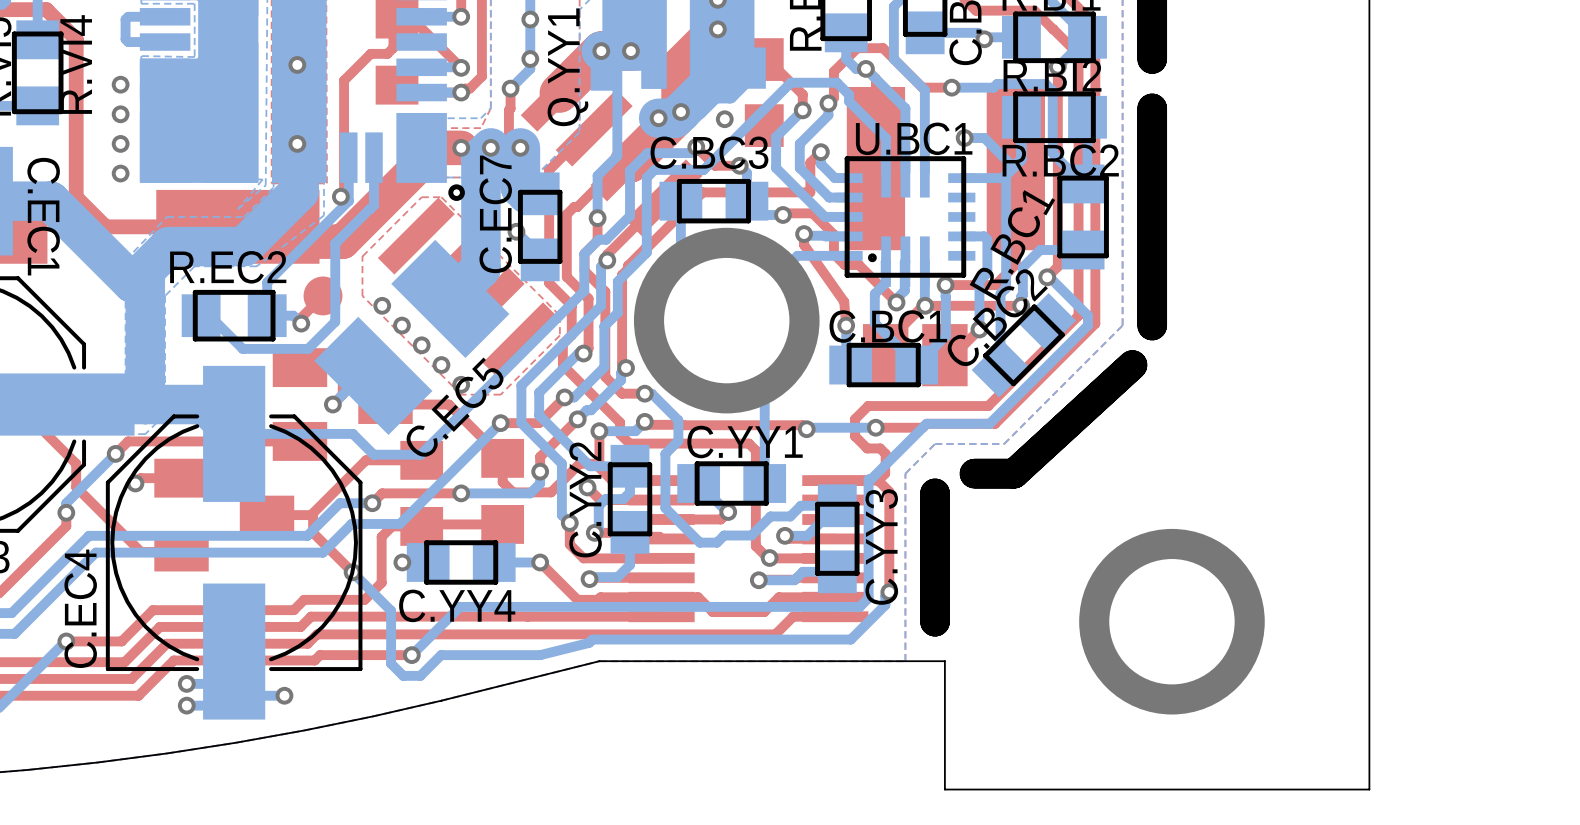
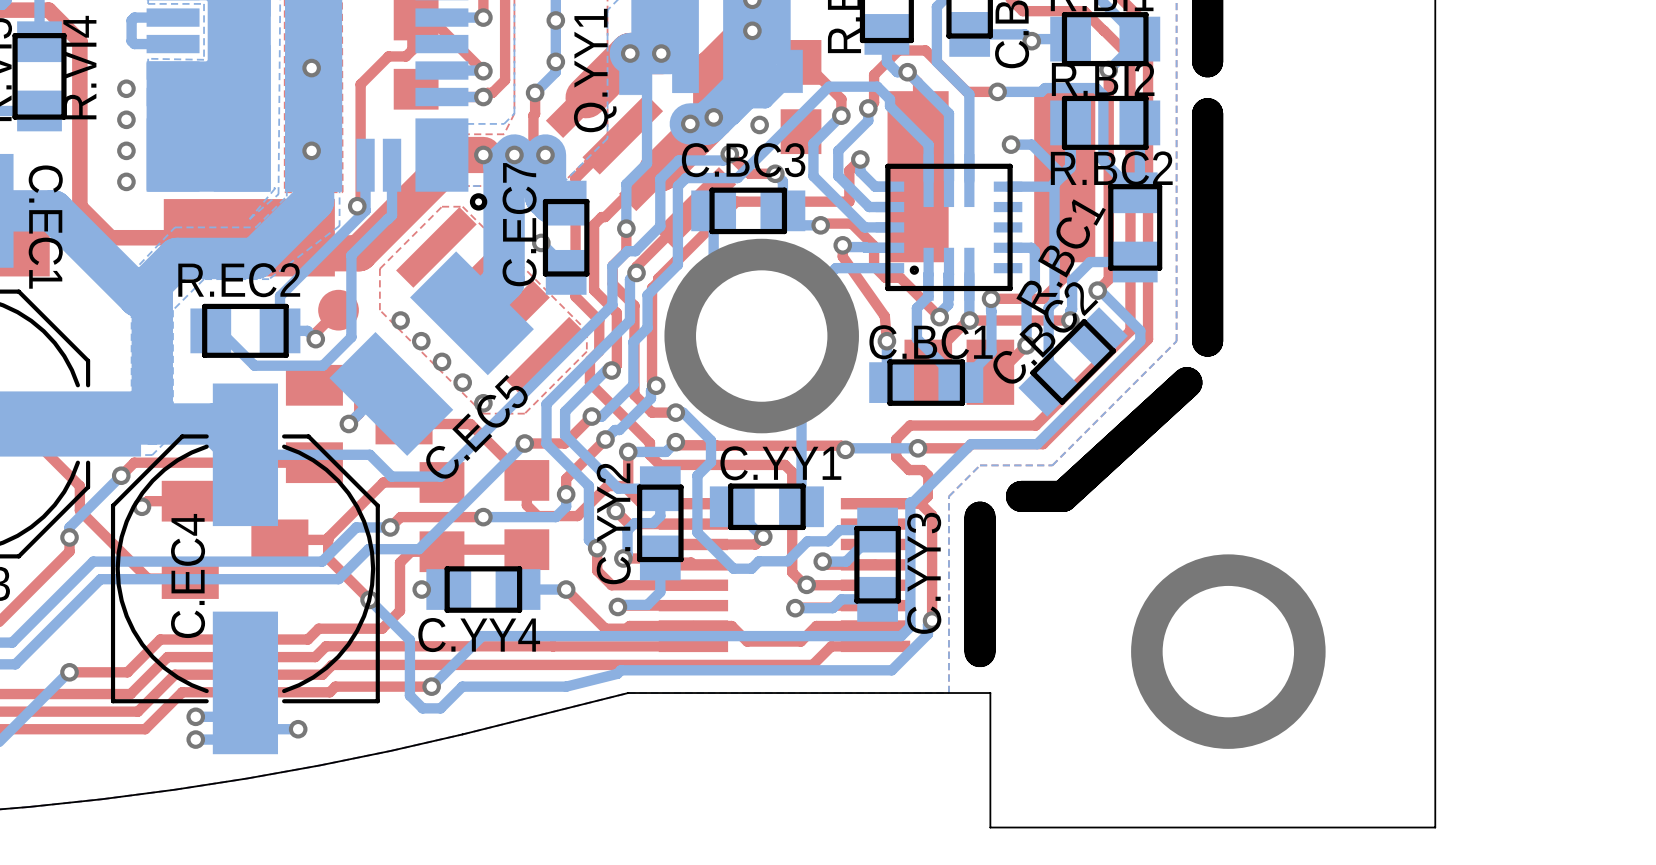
U.BC1 name: U.BC1 (914, 138) -> none
C.EC4 name position: C.EC4 (80, 608) -> C.EC4 (188, 576)

